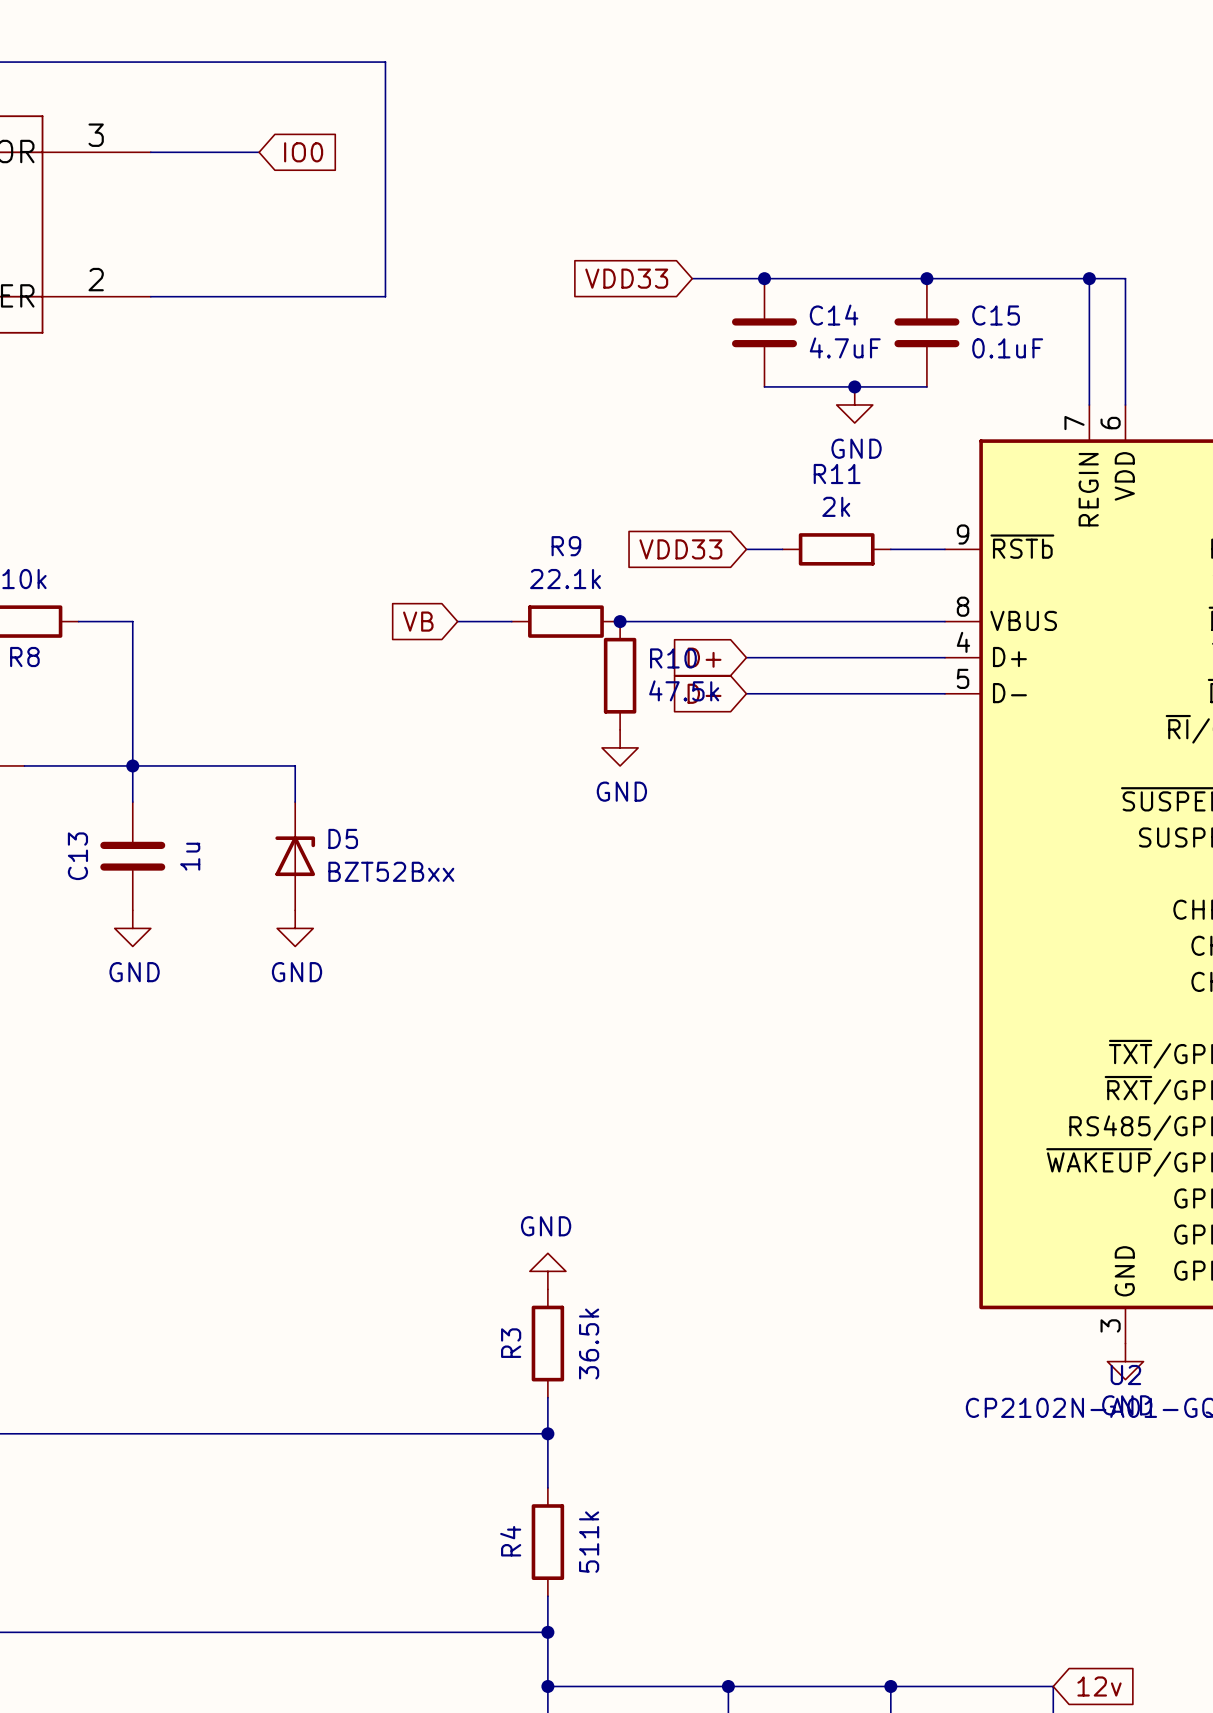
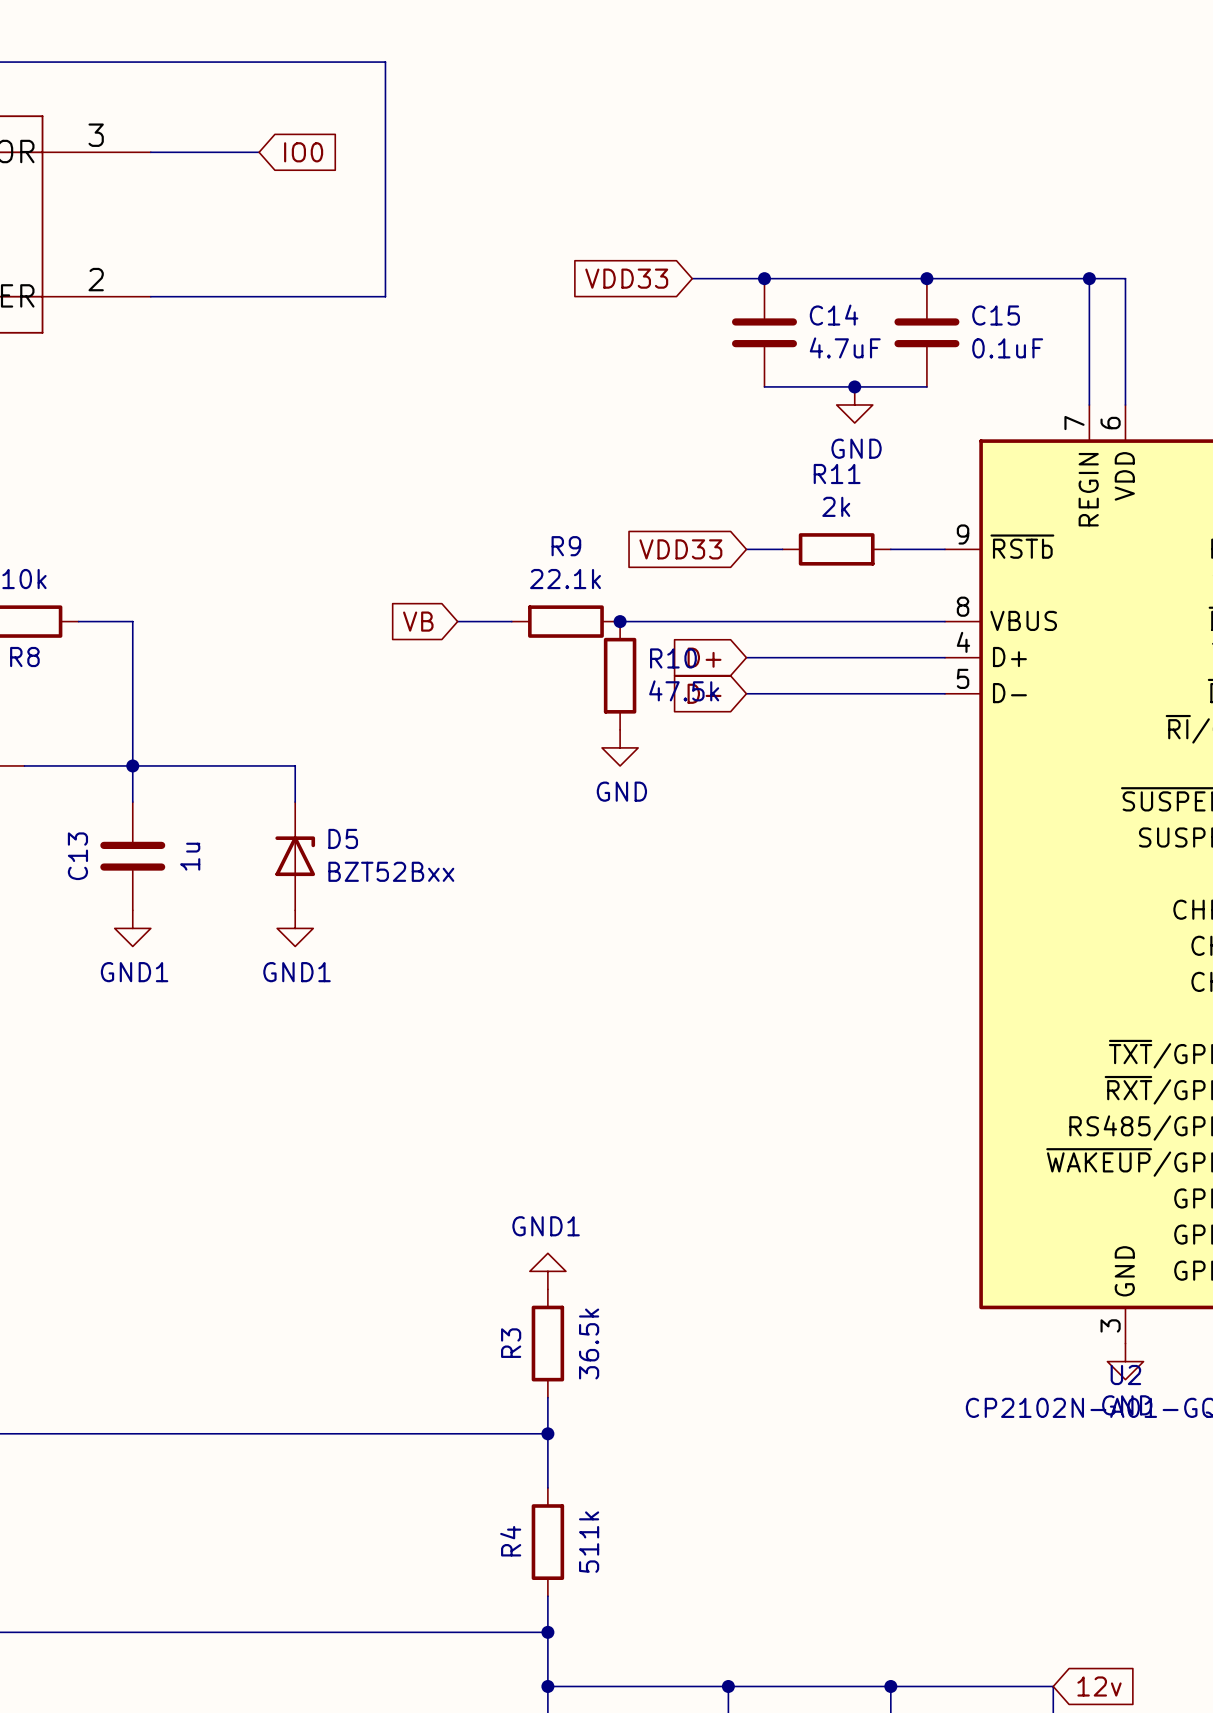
power symbol: GND (132, 928) -> GND1 (132, 928)
power symbol: GND (295, 928) -> GND1 (295, 928)
power symbol: GND (547, 1271) -> GND1 (547, 1271)

